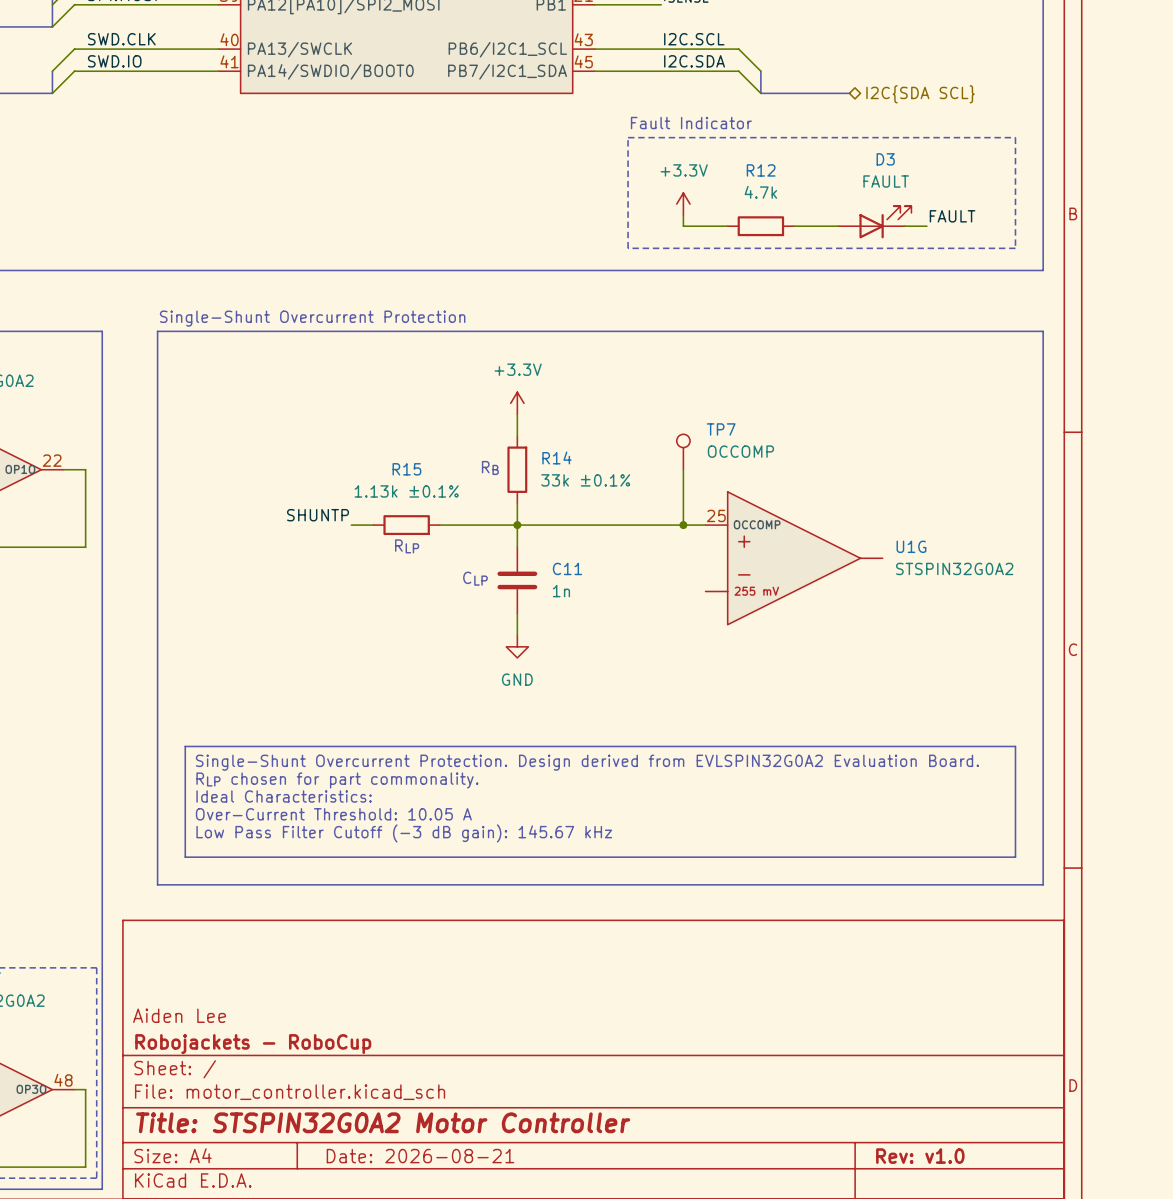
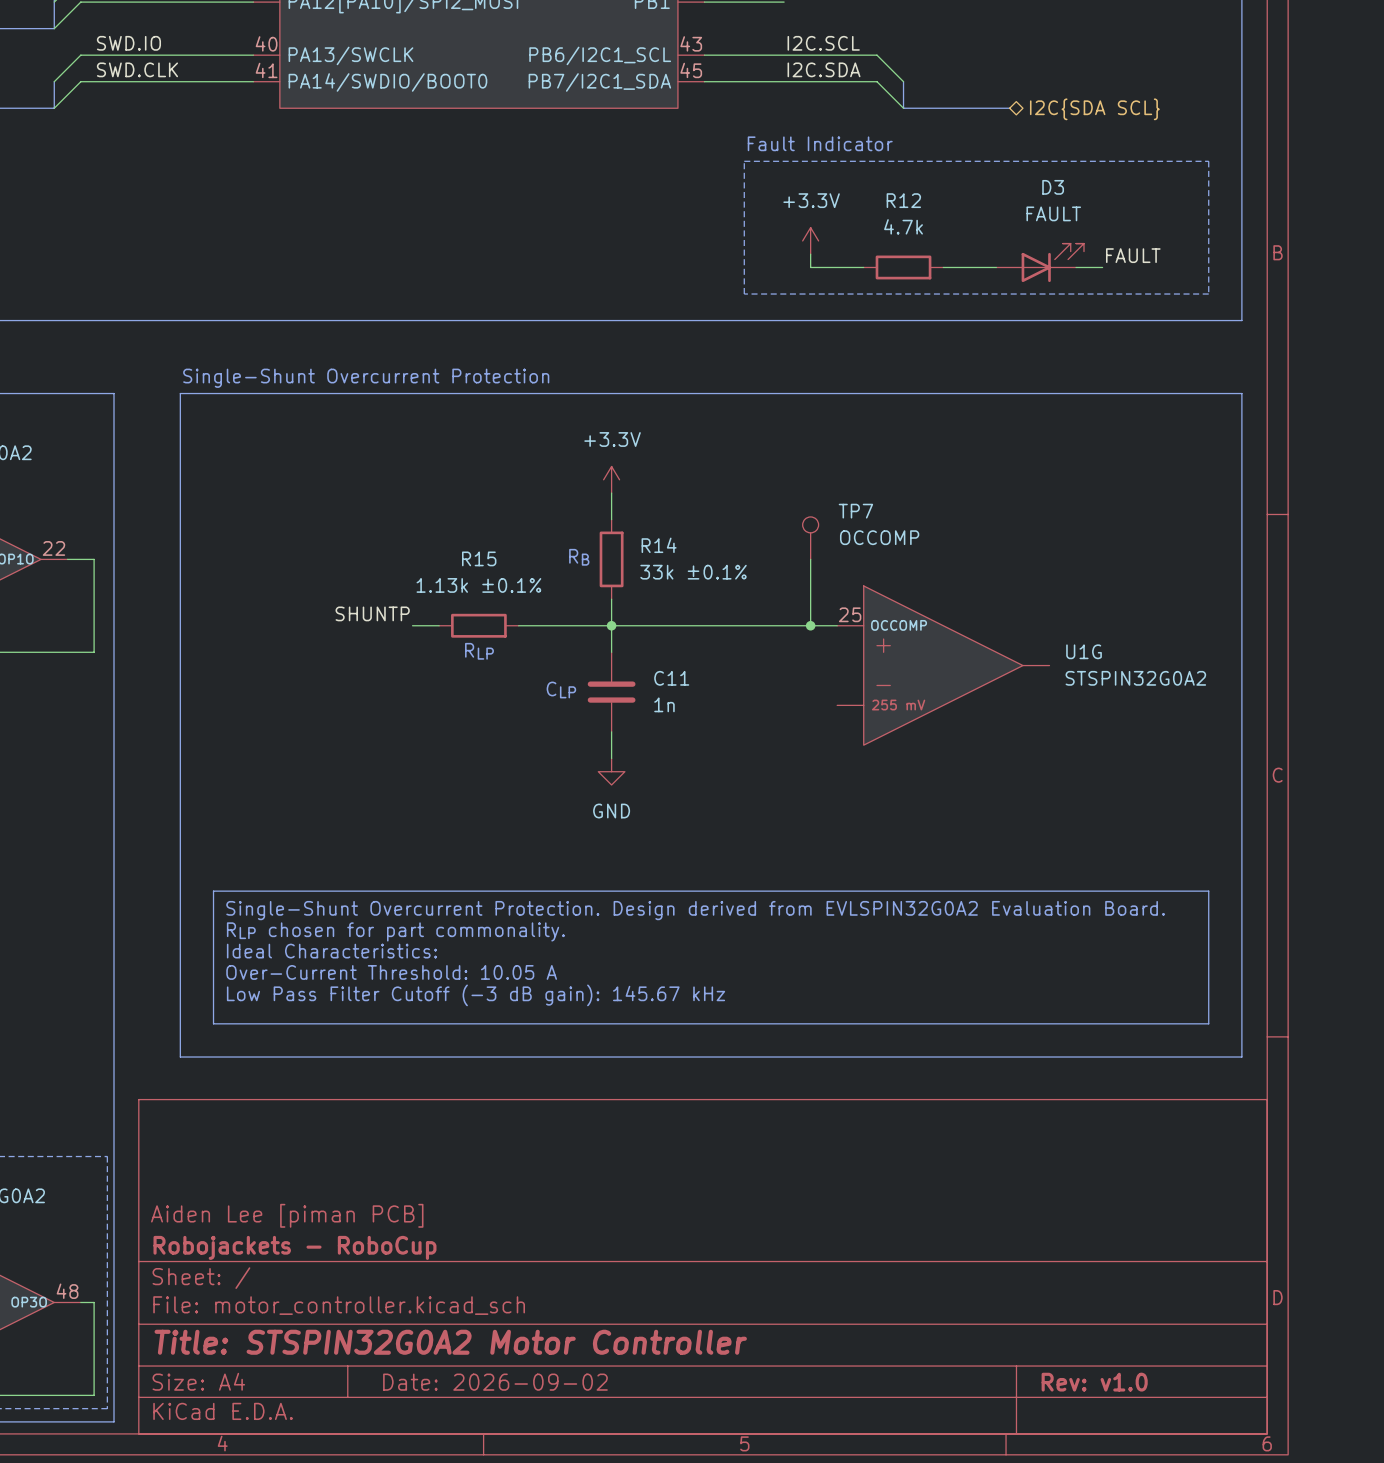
label: SWD.CLK (121, 39) -> SWD.IO (128, 43)
label: SWD.IO (114, 61) -> SWD.CLK (137, 69)
title block: Aiden Lee (179, 1015) -> Aiden Lee [piman PCB] (287, 1215)
title block: Date: 2026-08-21 (420, 1156) -> Date: 2026-09-02 (495, 1382)

